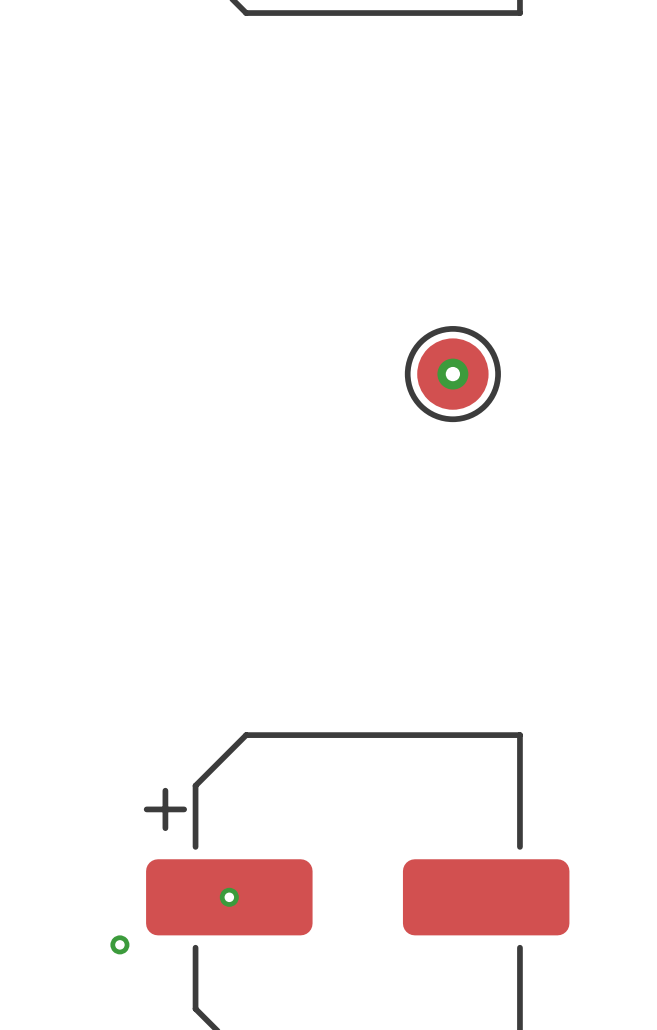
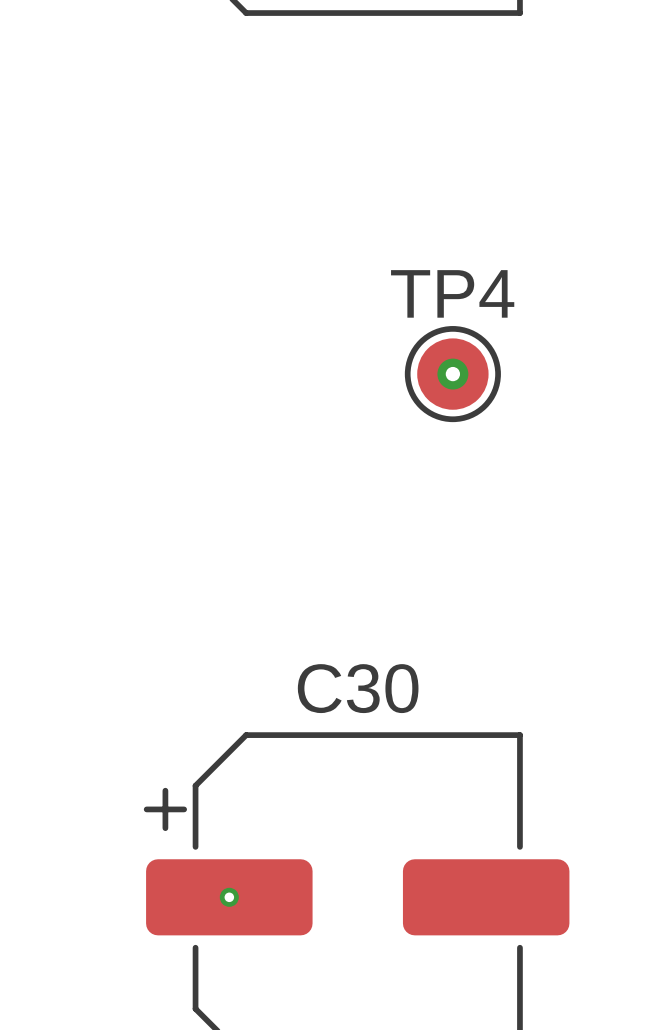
TP4 name: none -> TP4 (452, 293)
C30 name: none -> C30 (358, 688)
via: (119, 944) -> none

